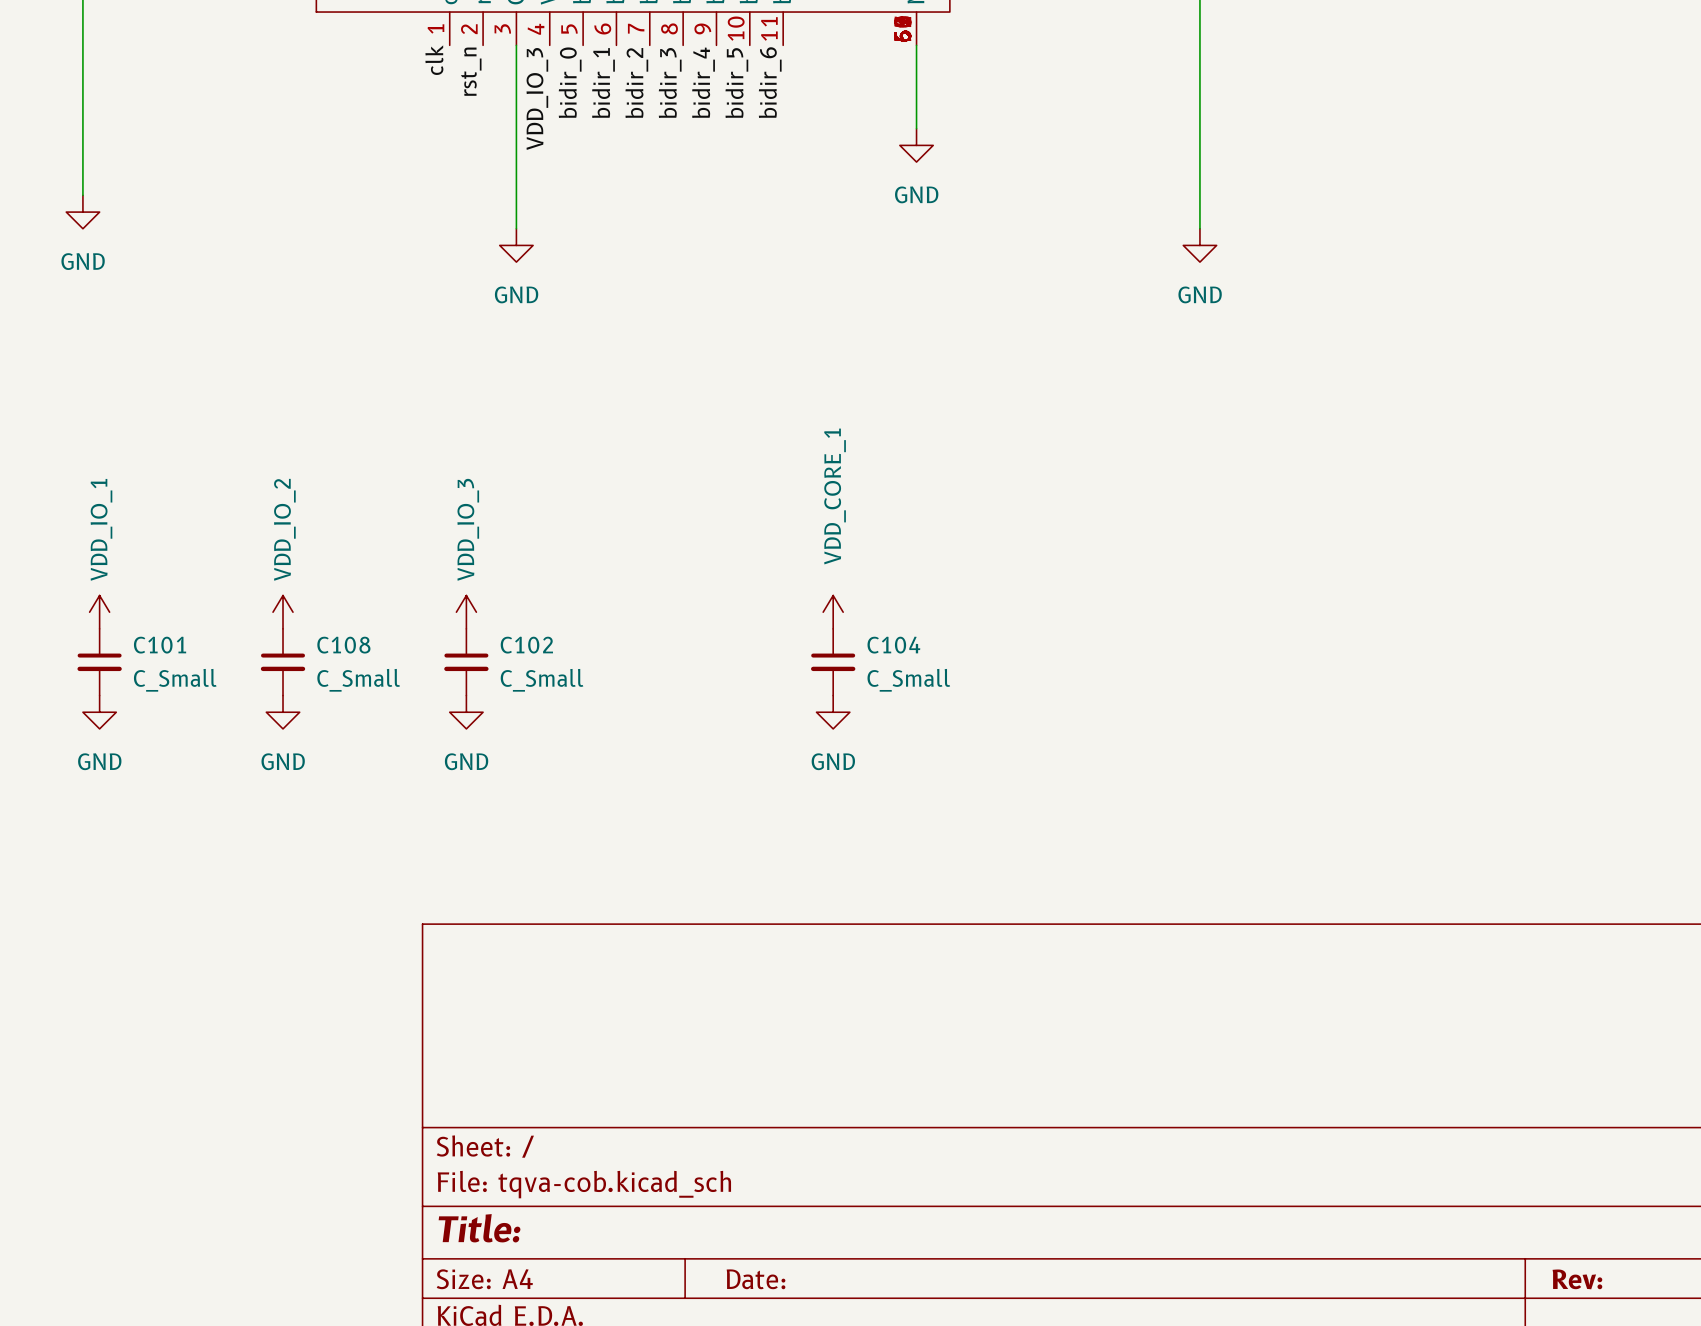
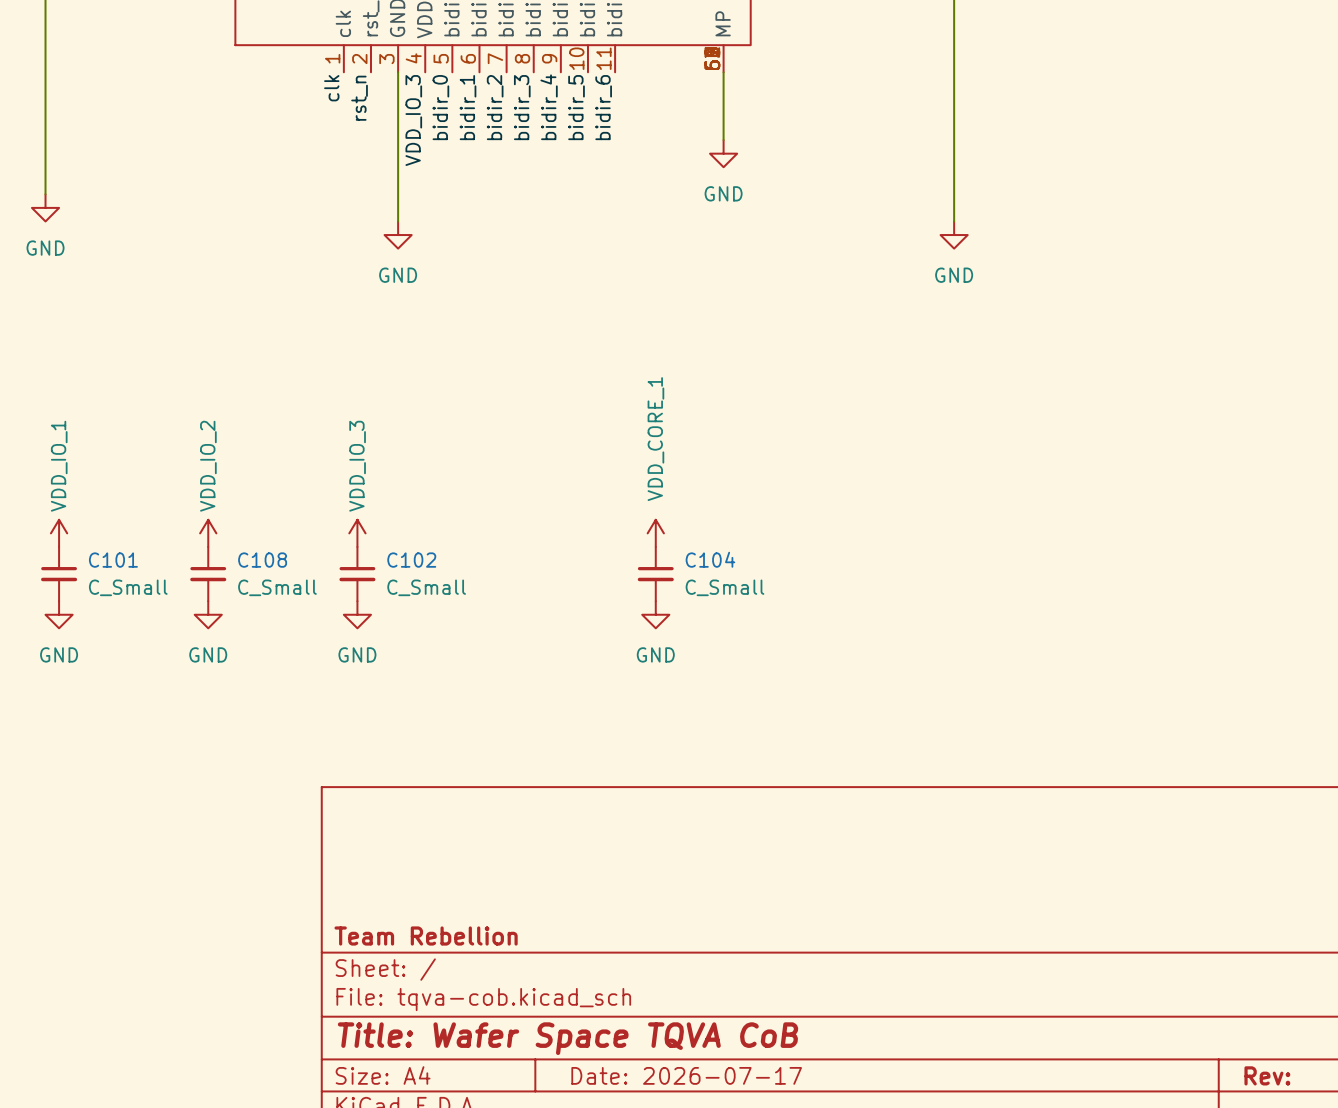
title block: none -> Team Rebellion (426, 936)
title block: Title: (479, 1228) -> Title: Wafer Space TQVA CoB (568, 1038)
title block: Date: (756, 1279) -> Date: 2026-07-17 (686, 1075)

